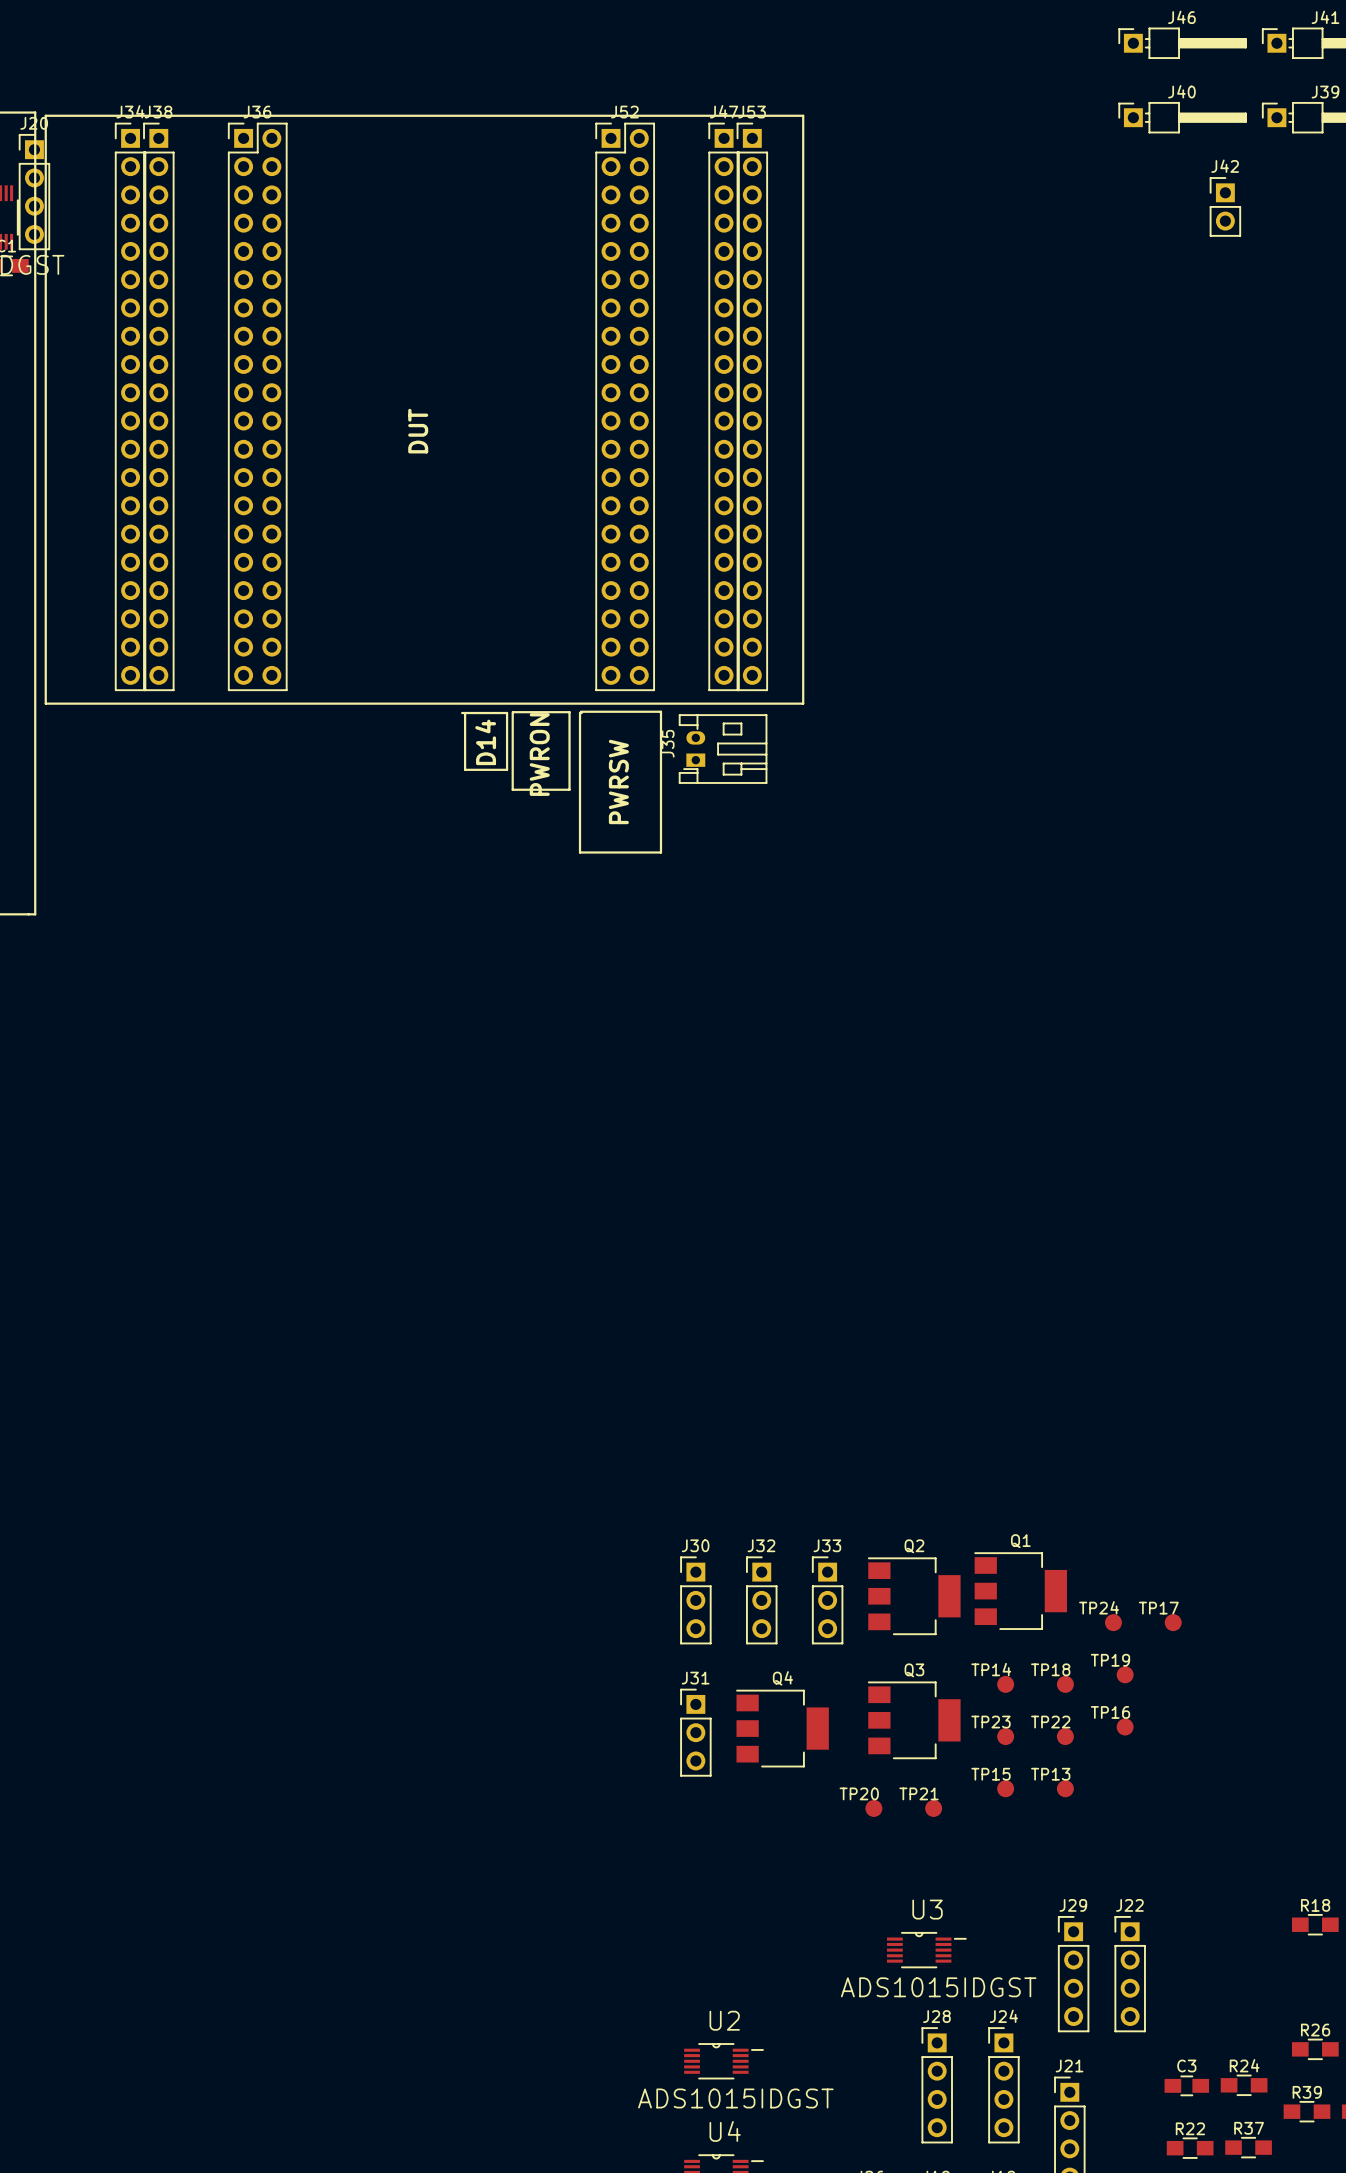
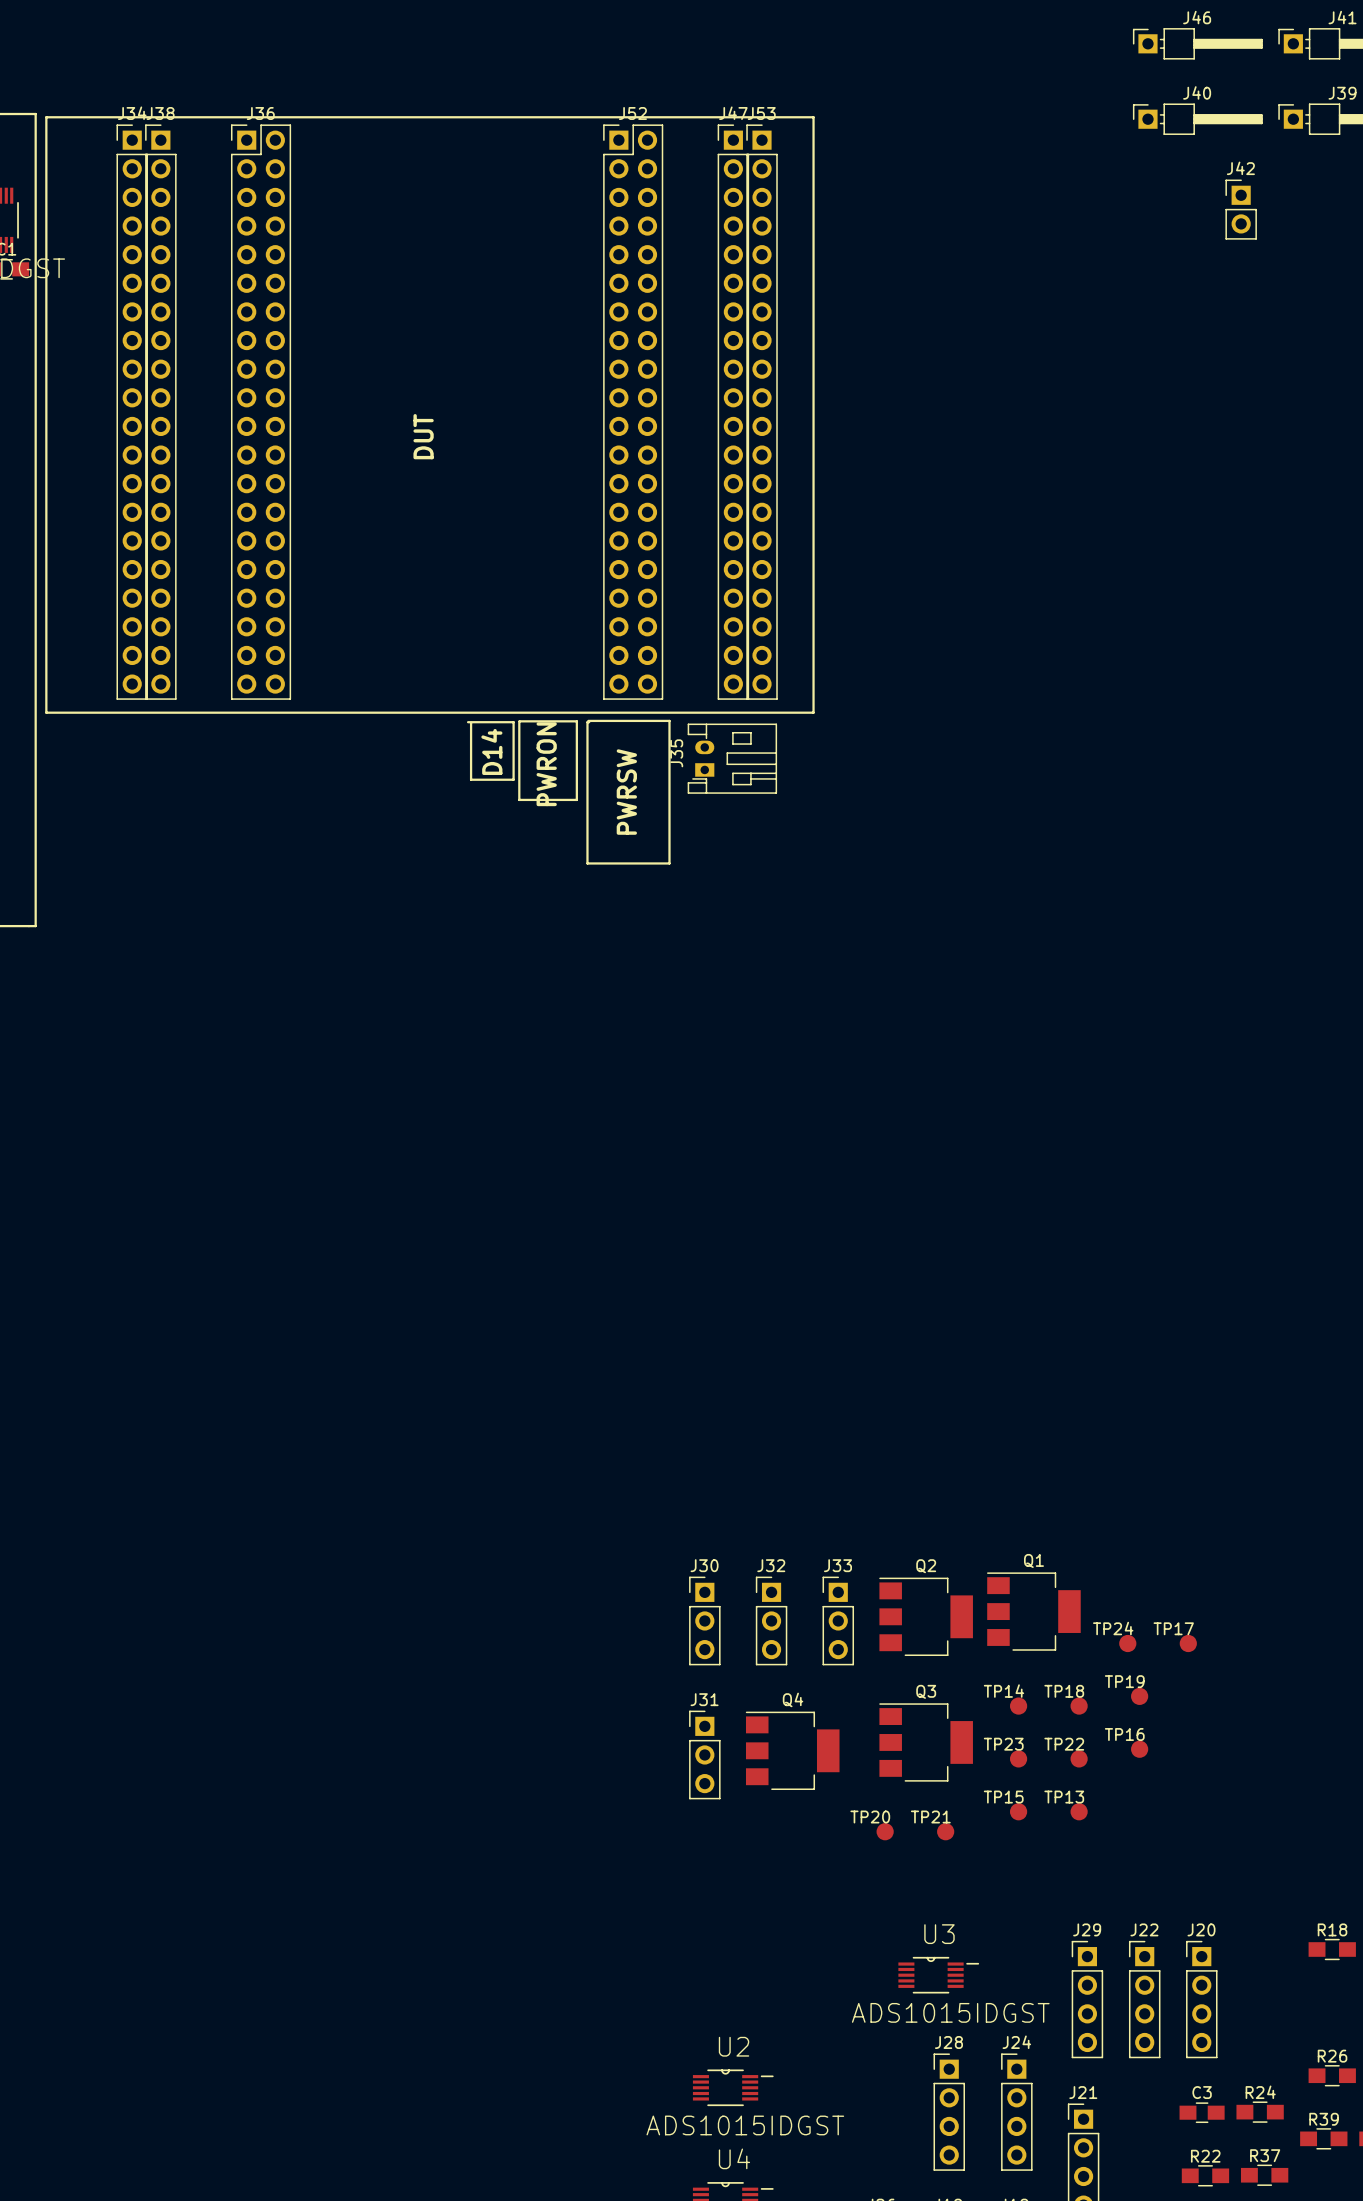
J20 position: (34, 192) -> (1201, 1999)

